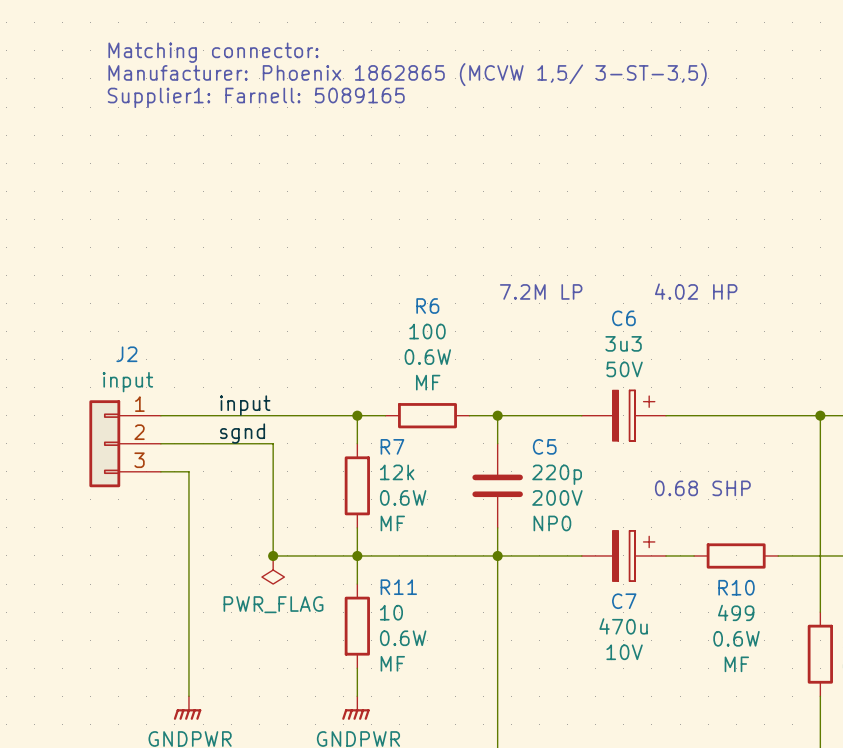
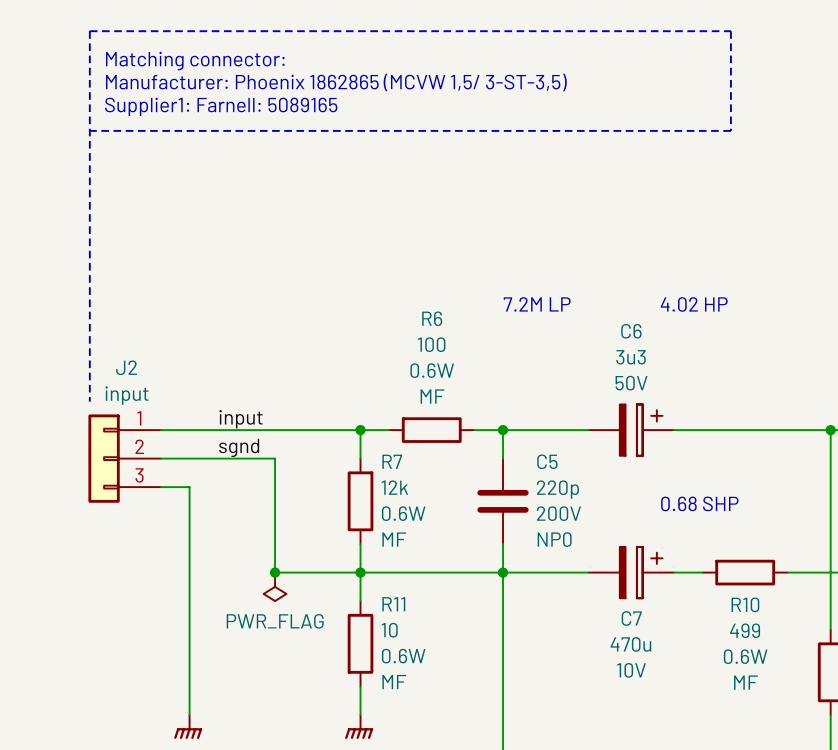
line: none -> (89, 130) (730, 130) (730, 31) (89, 31) (89, 401)

